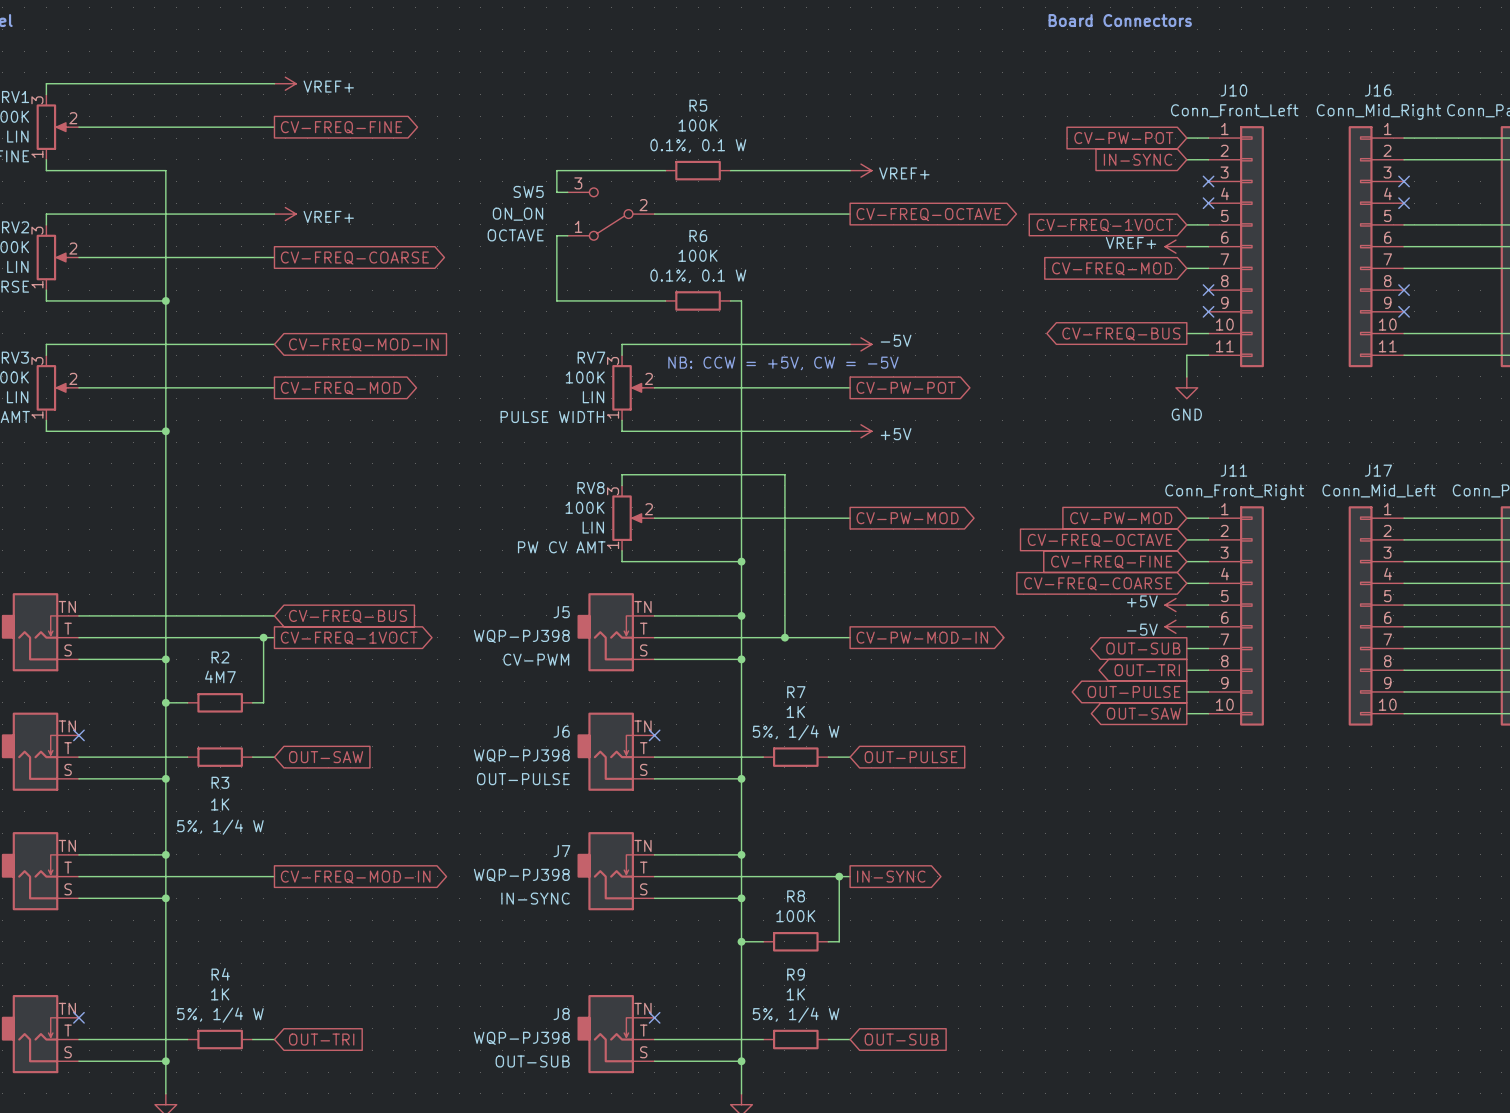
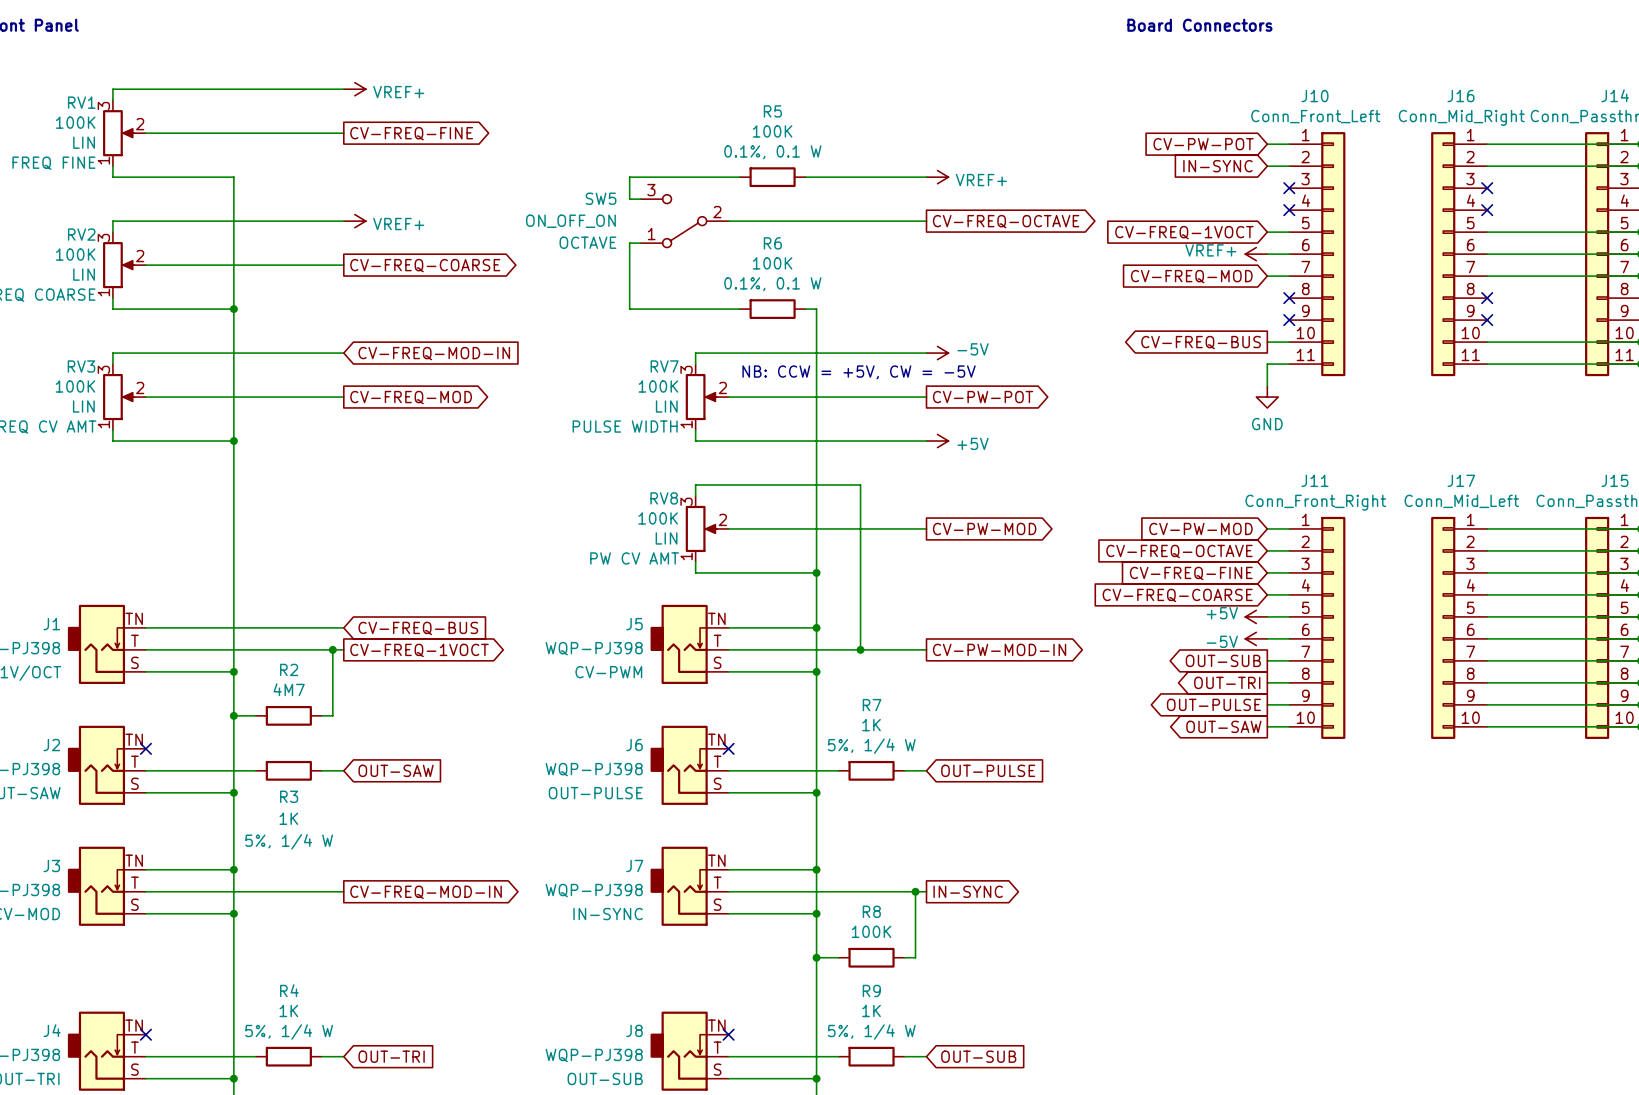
SW5 value: ON_ON (517, 214) -> ON_OFF_ON (570, 221)

